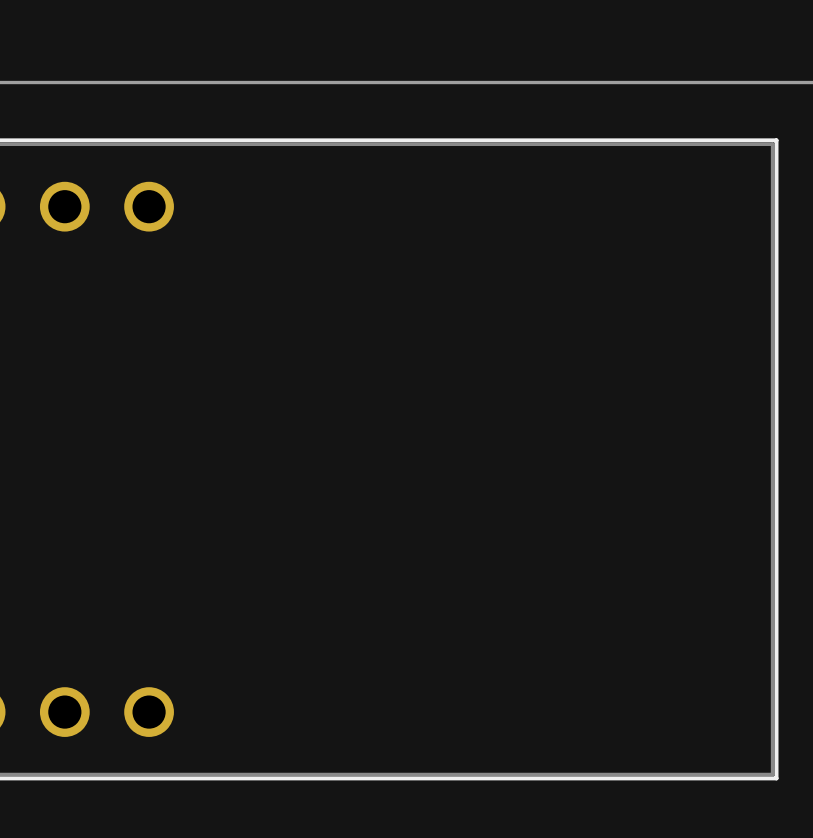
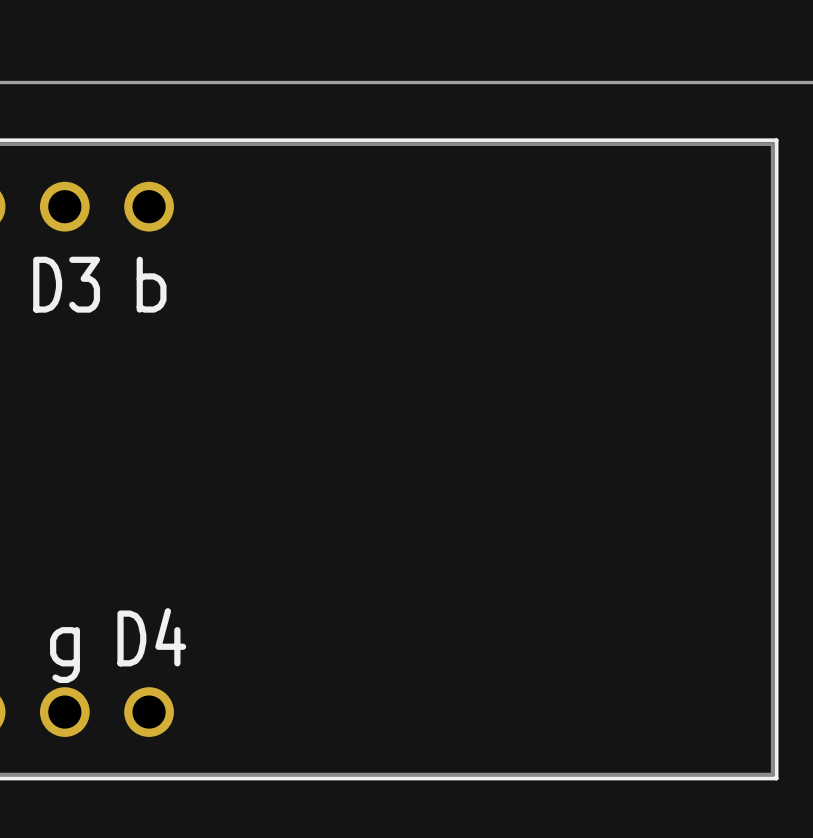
text: none -> D3 (66, 284)
text: none -> b (151, 284)
text: none -> D4 (151, 637)
text: none -> g (64, 655)

